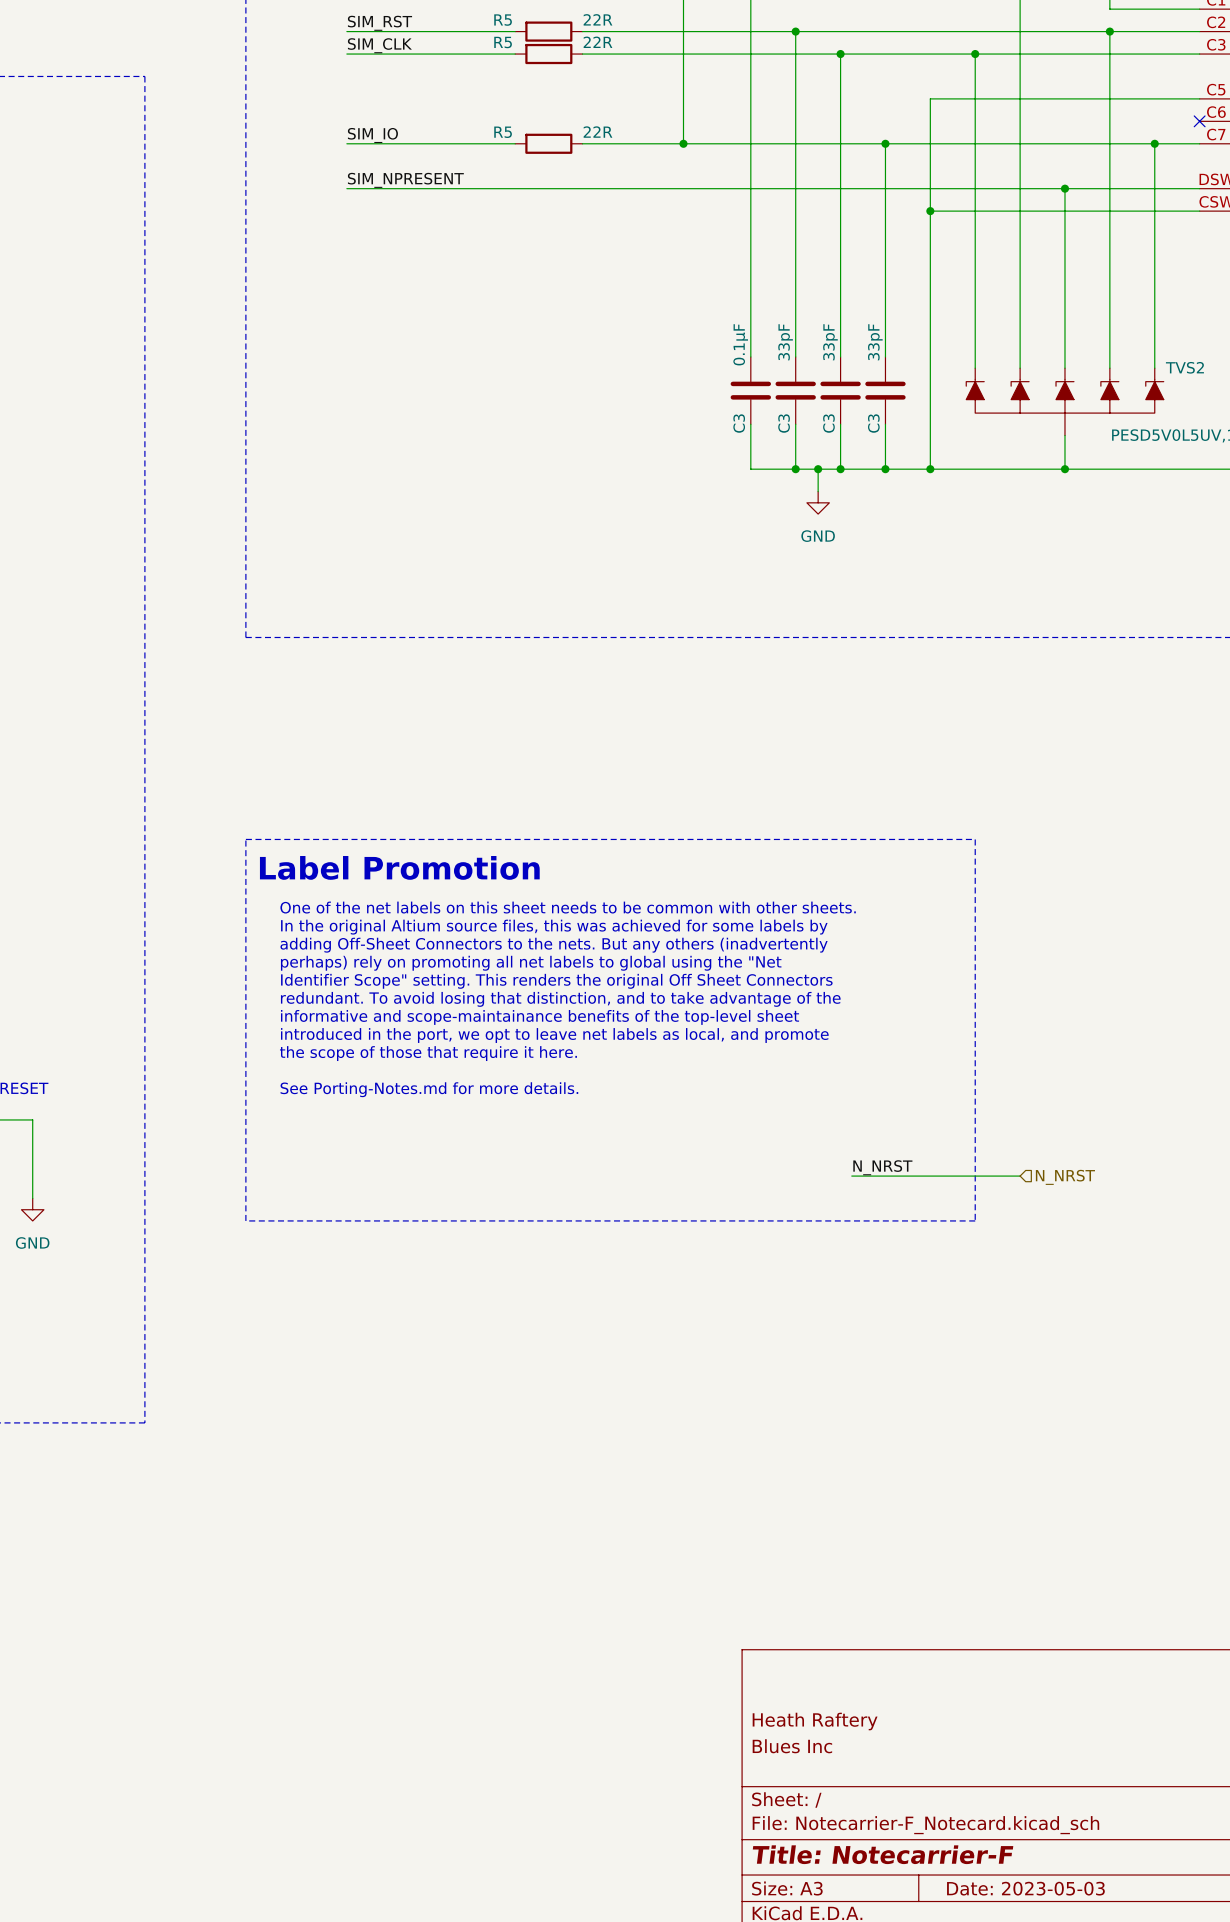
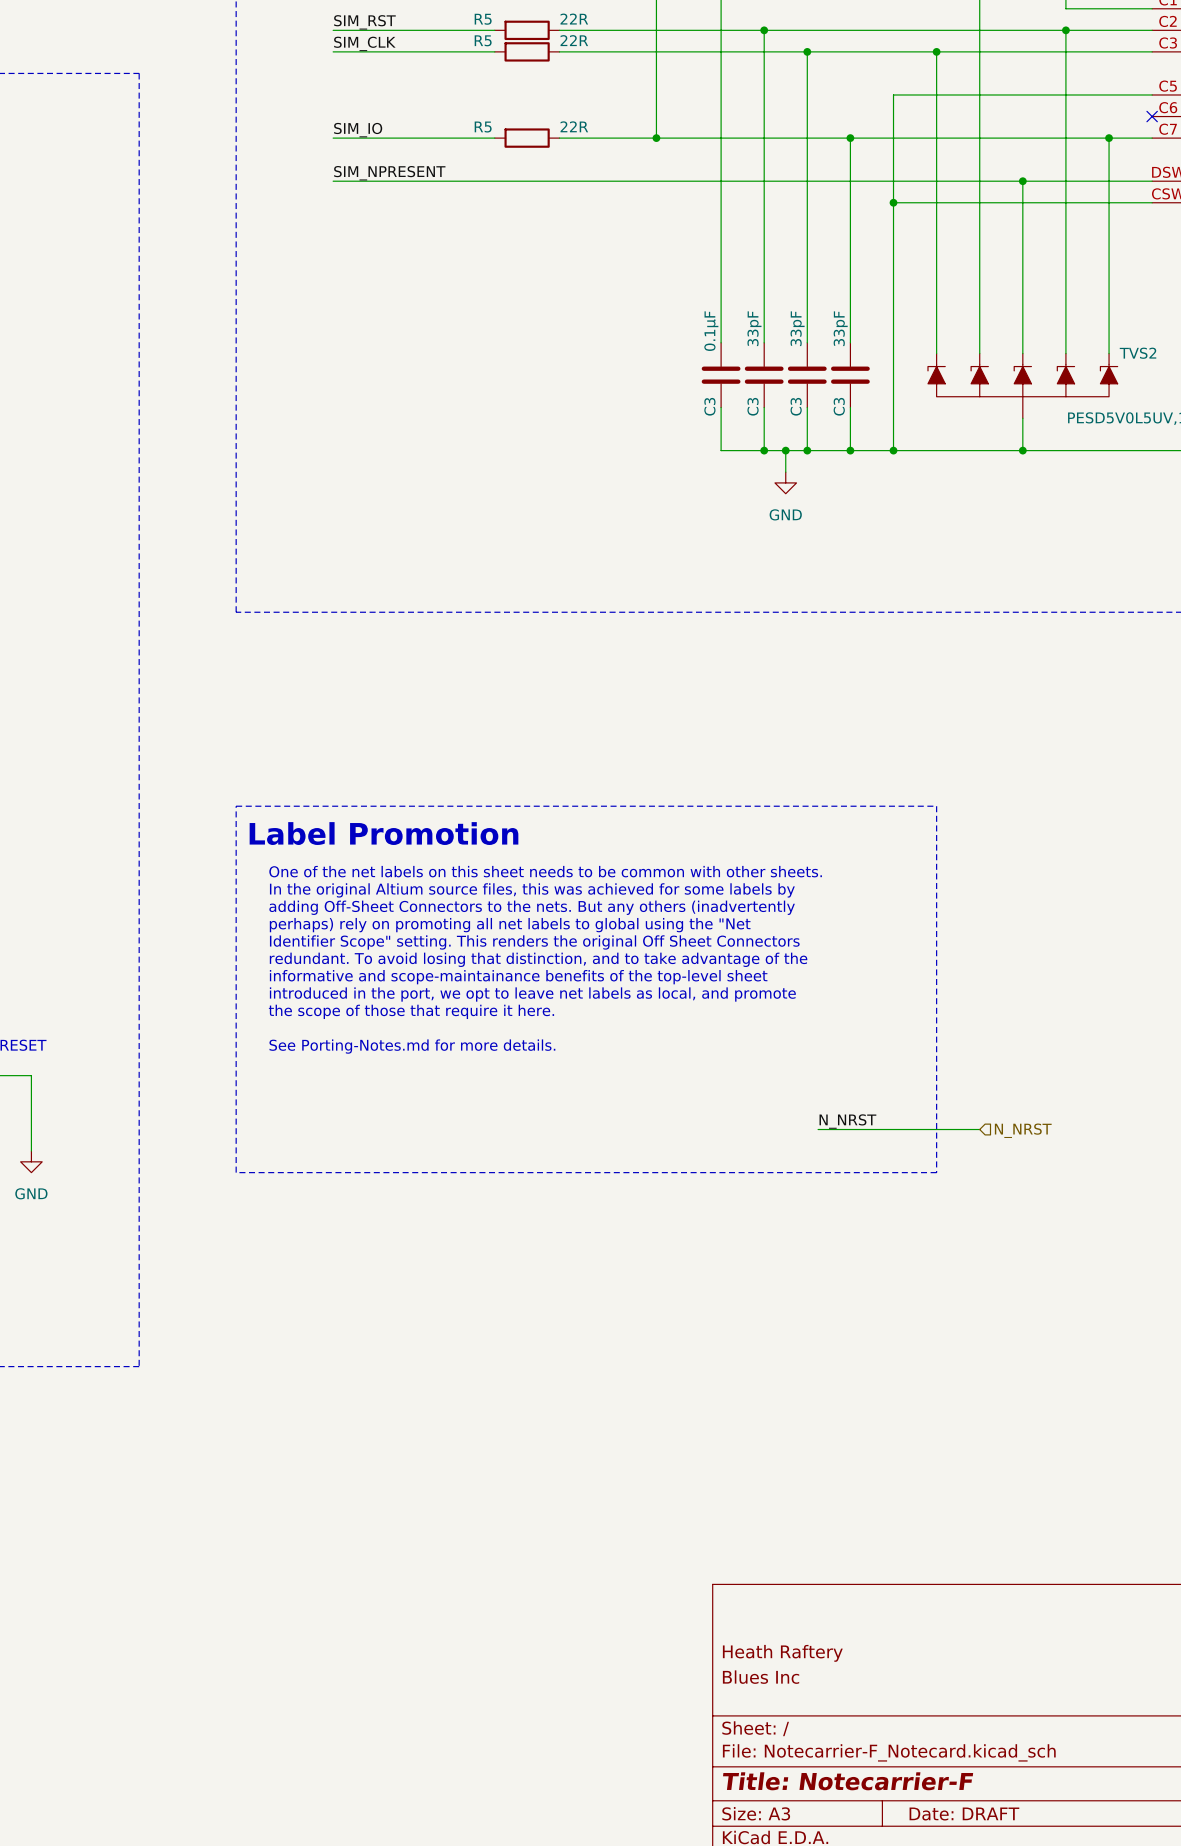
title block: Date: 2023-05-03 (1025, 1888) -> Date: DRAFT (964, 1814)

